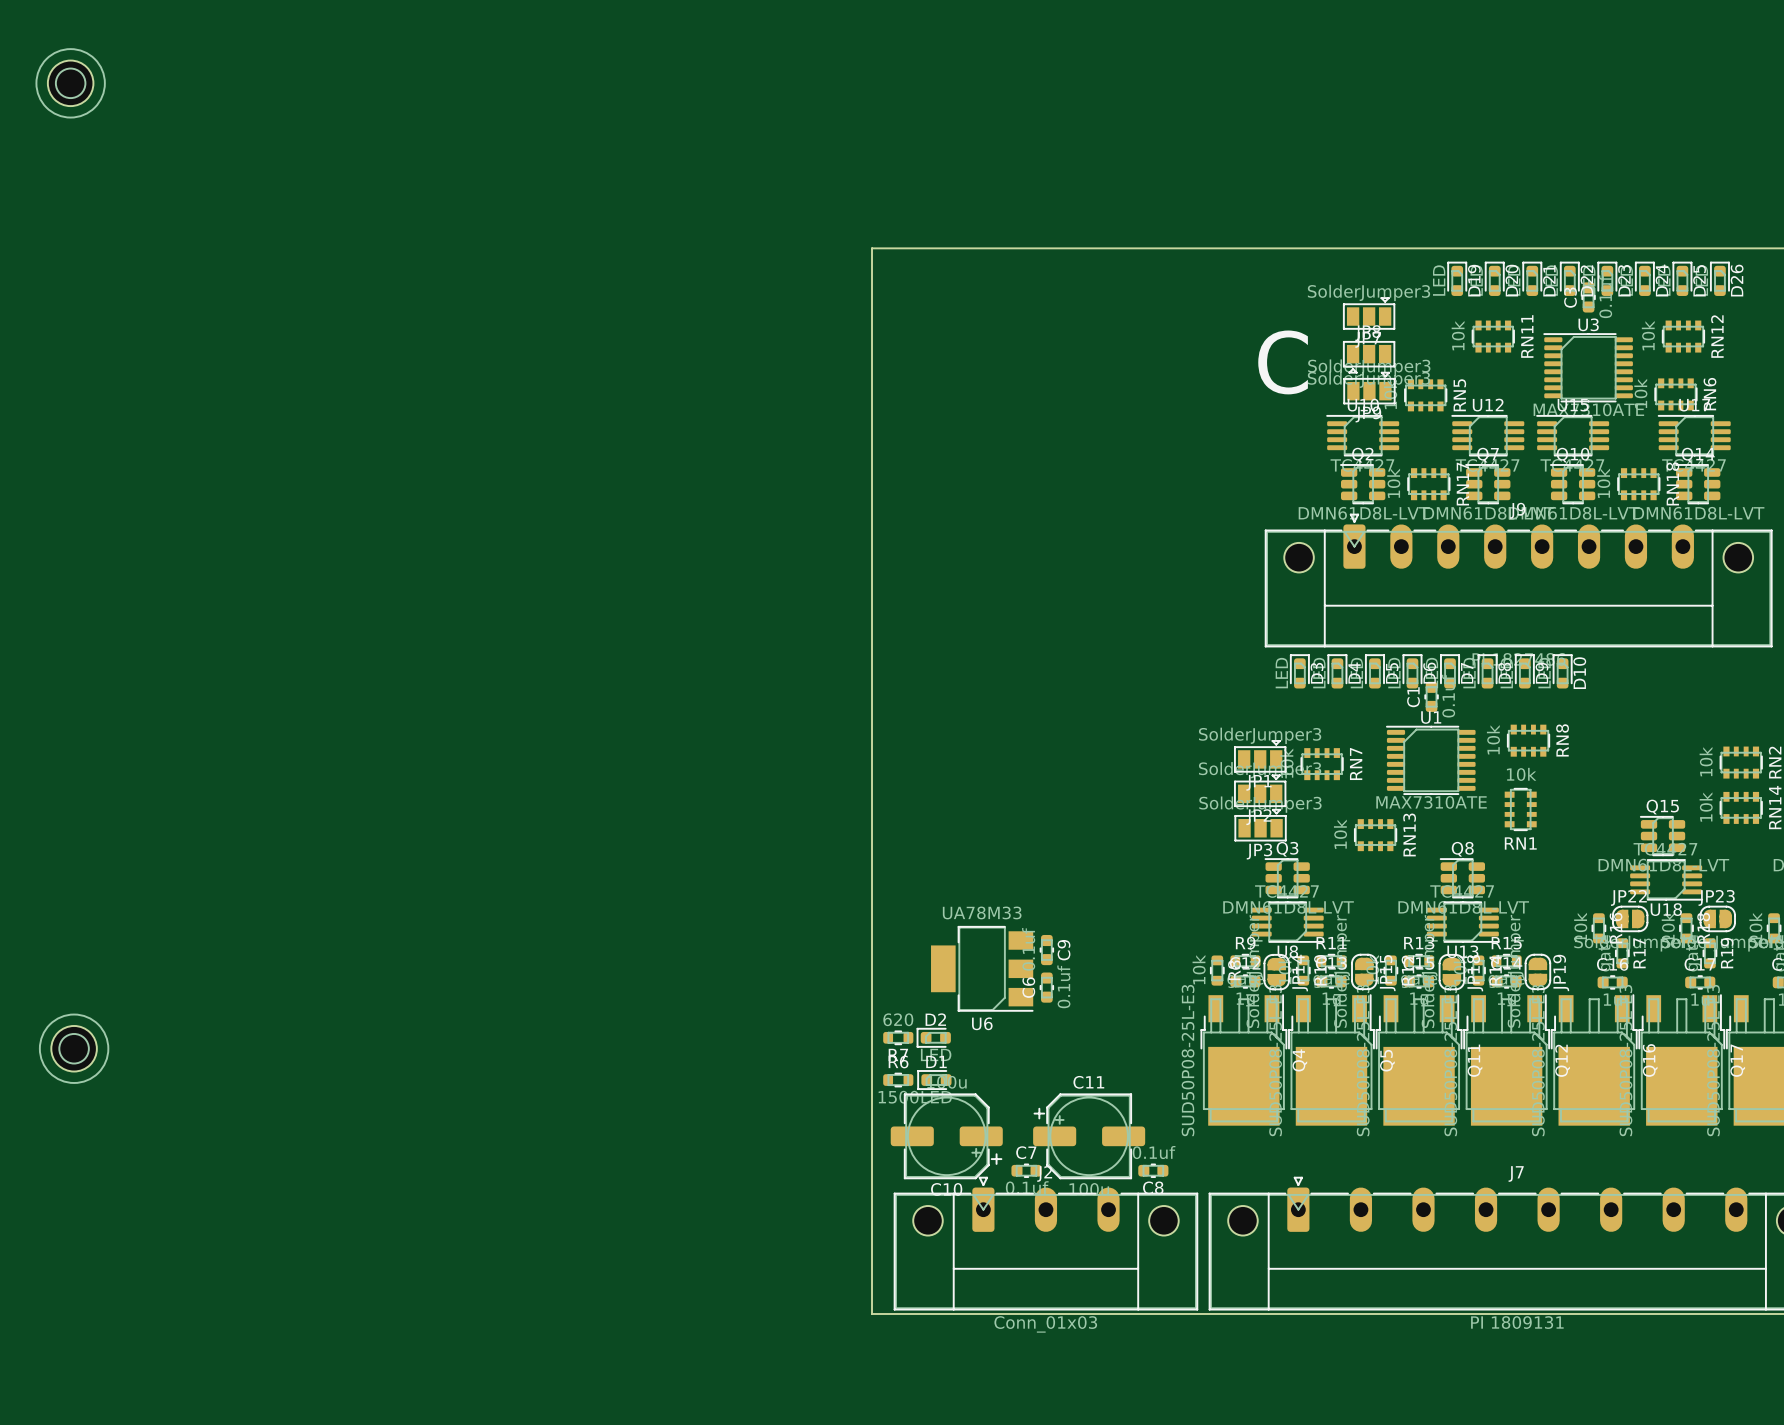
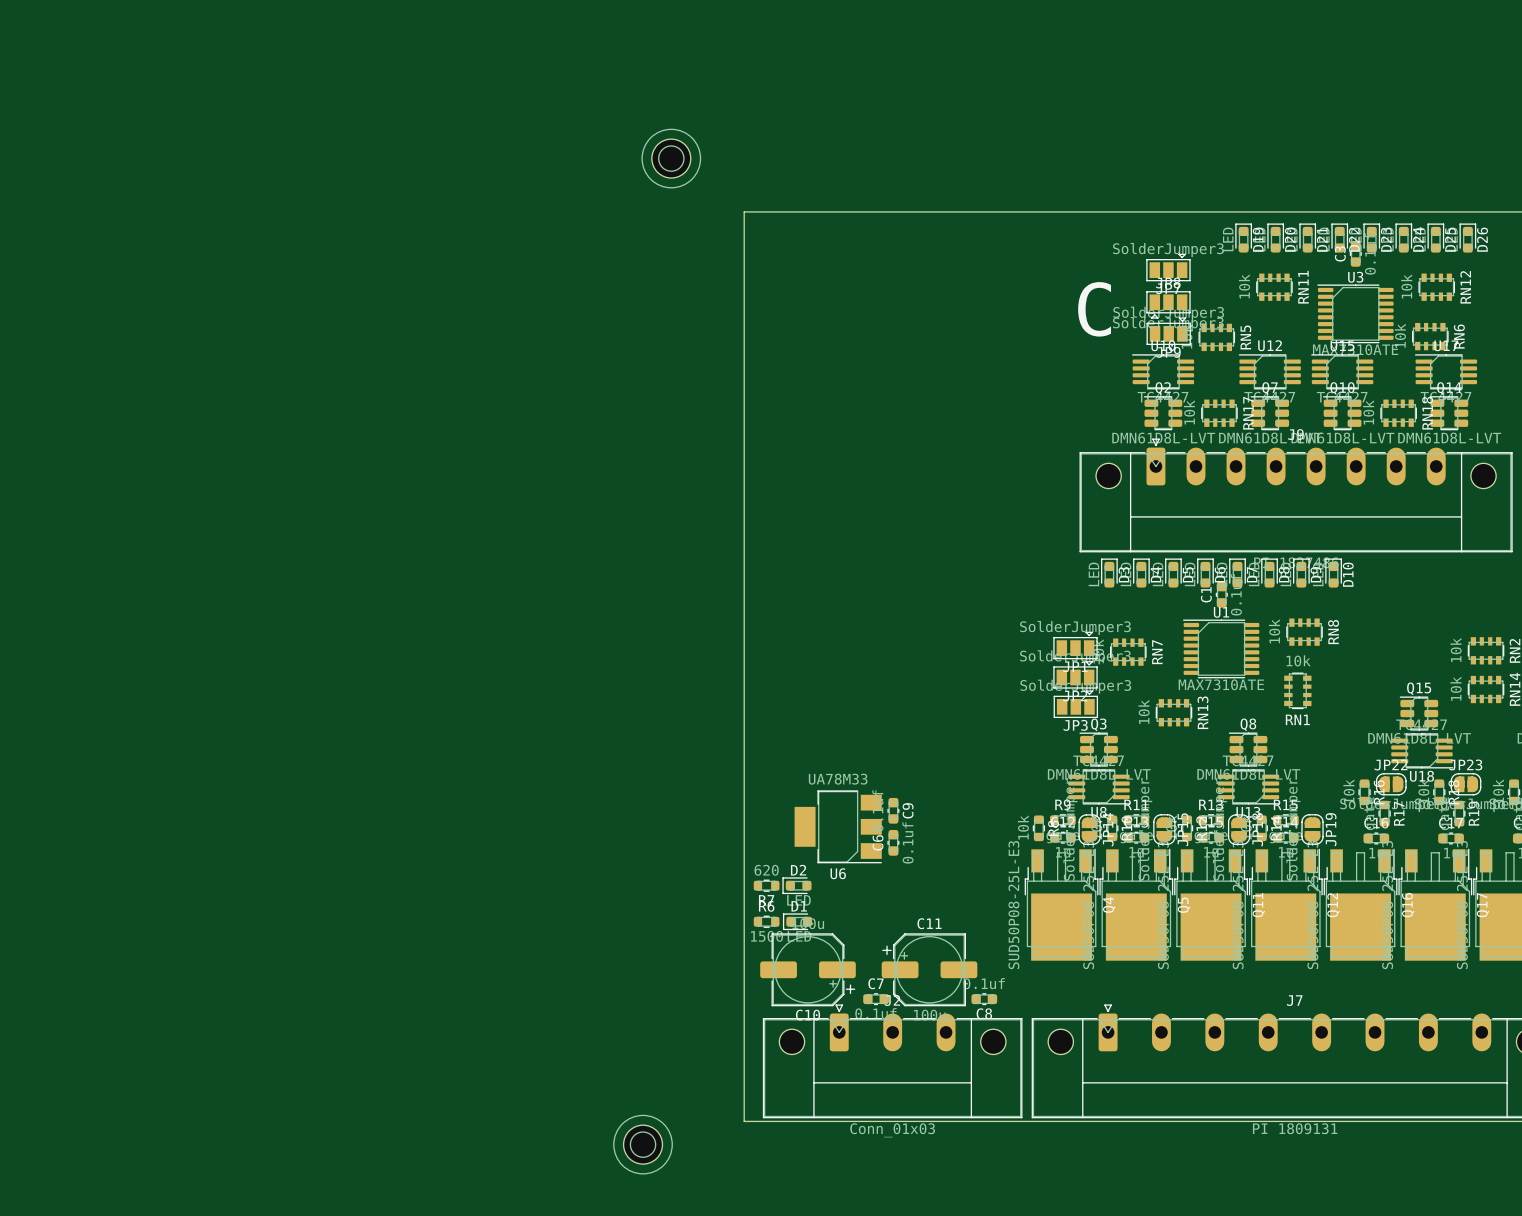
part: (70, 83) -> none
part: none -> (671, 158)
part: (74, 1048) -> none
part: none -> (643, 1144)

